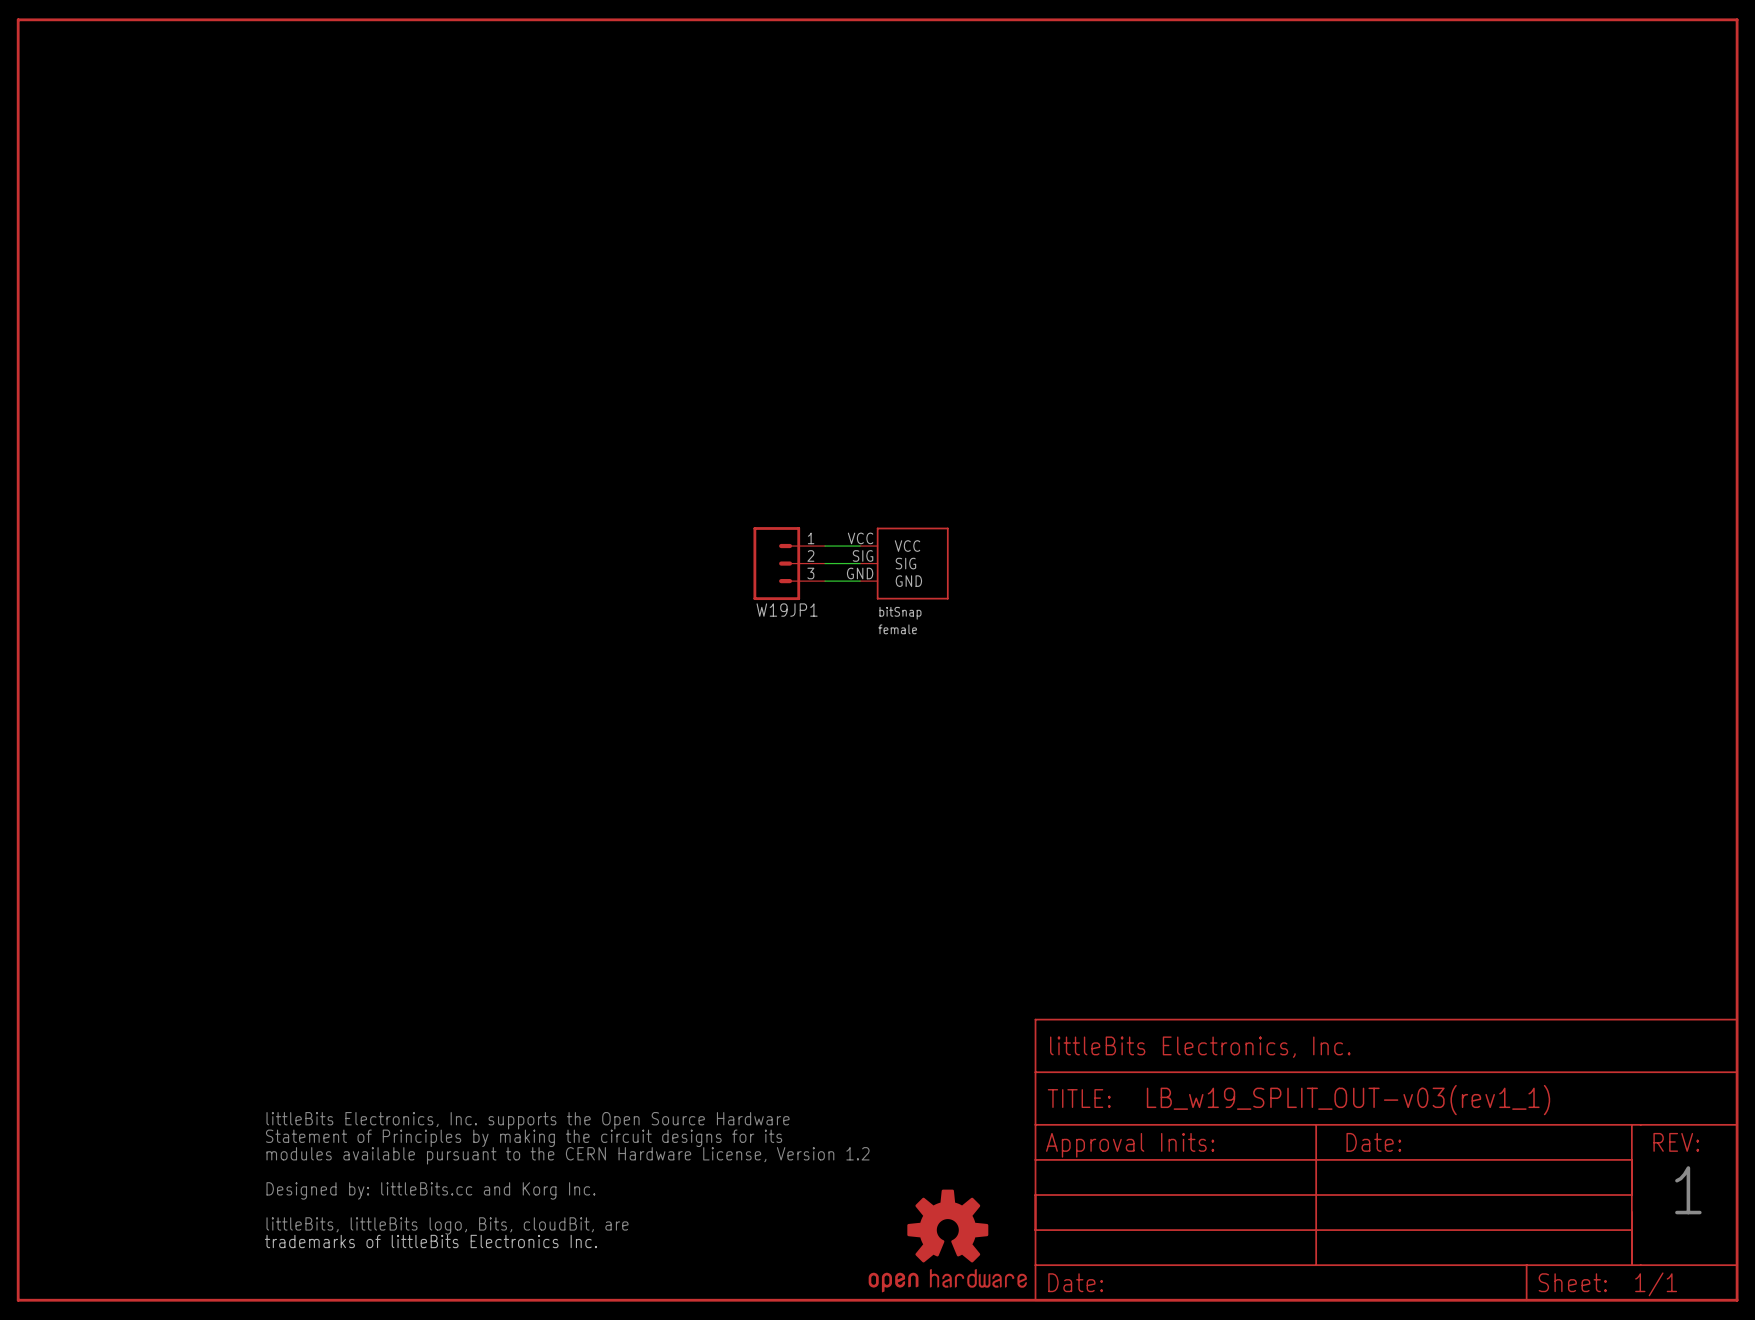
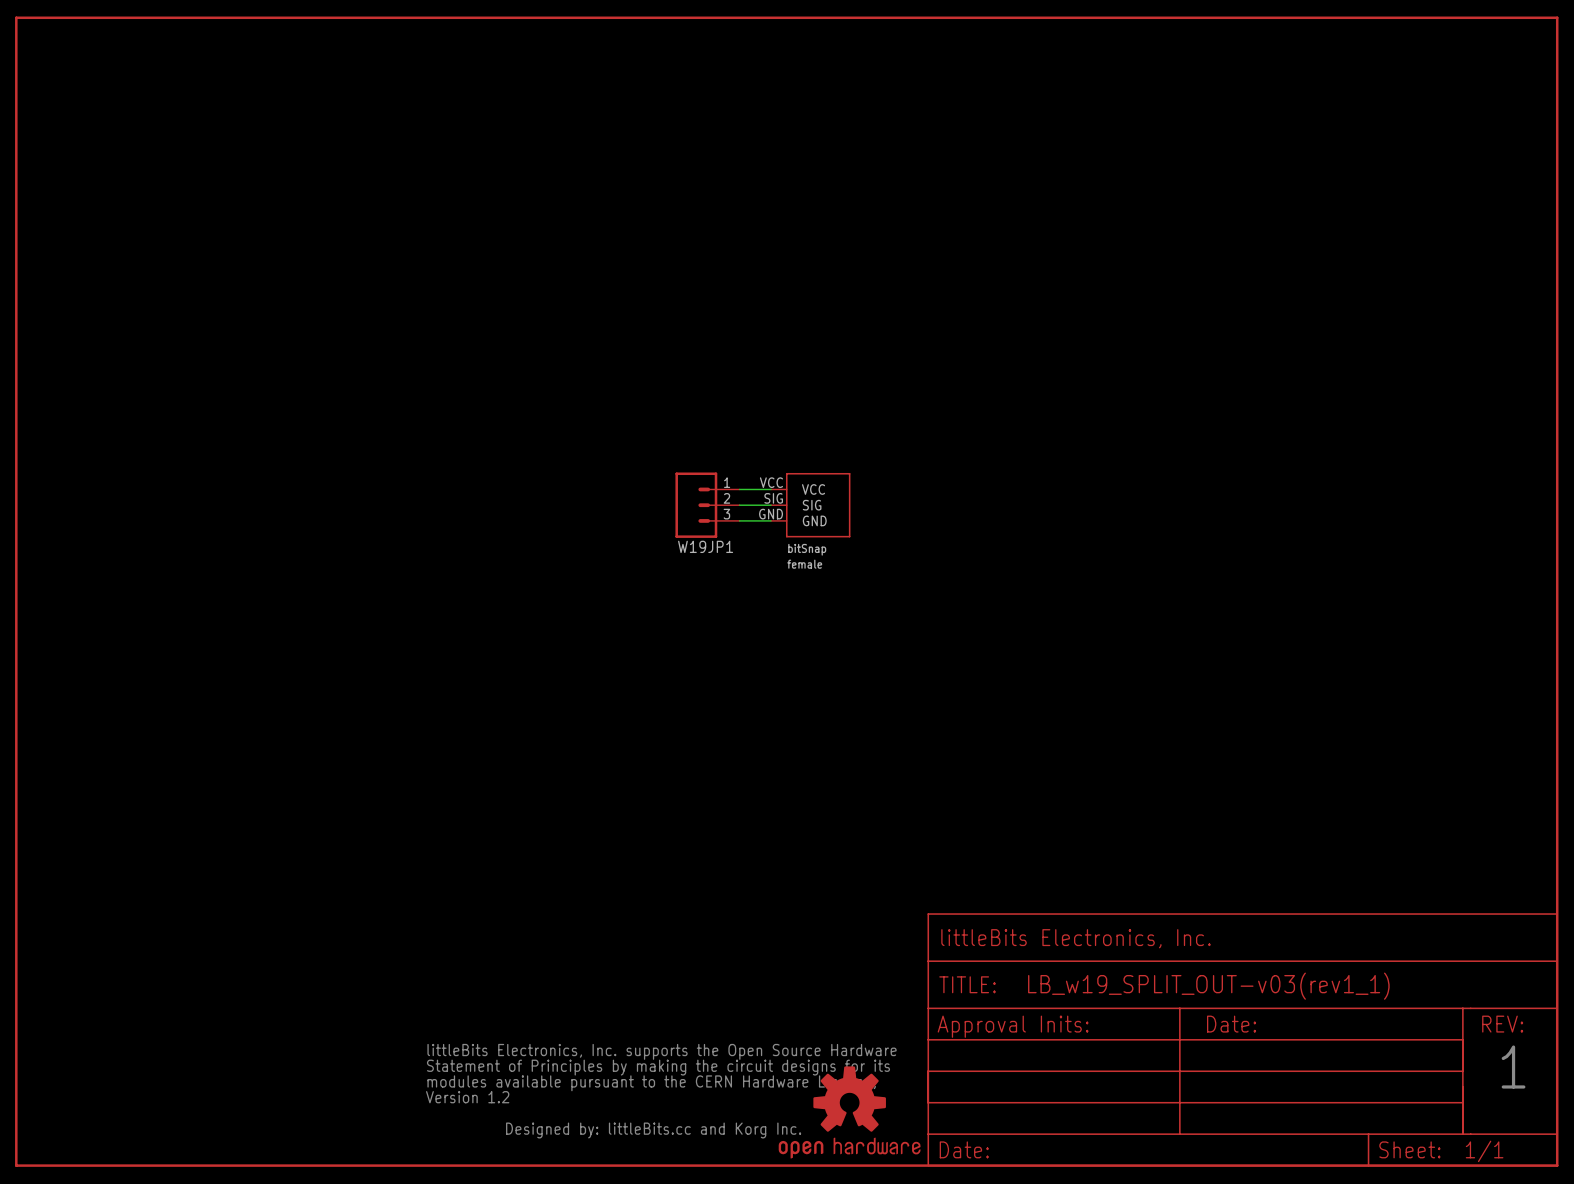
part: (567, 1180) -> none
part: none -> (661, 1091)

